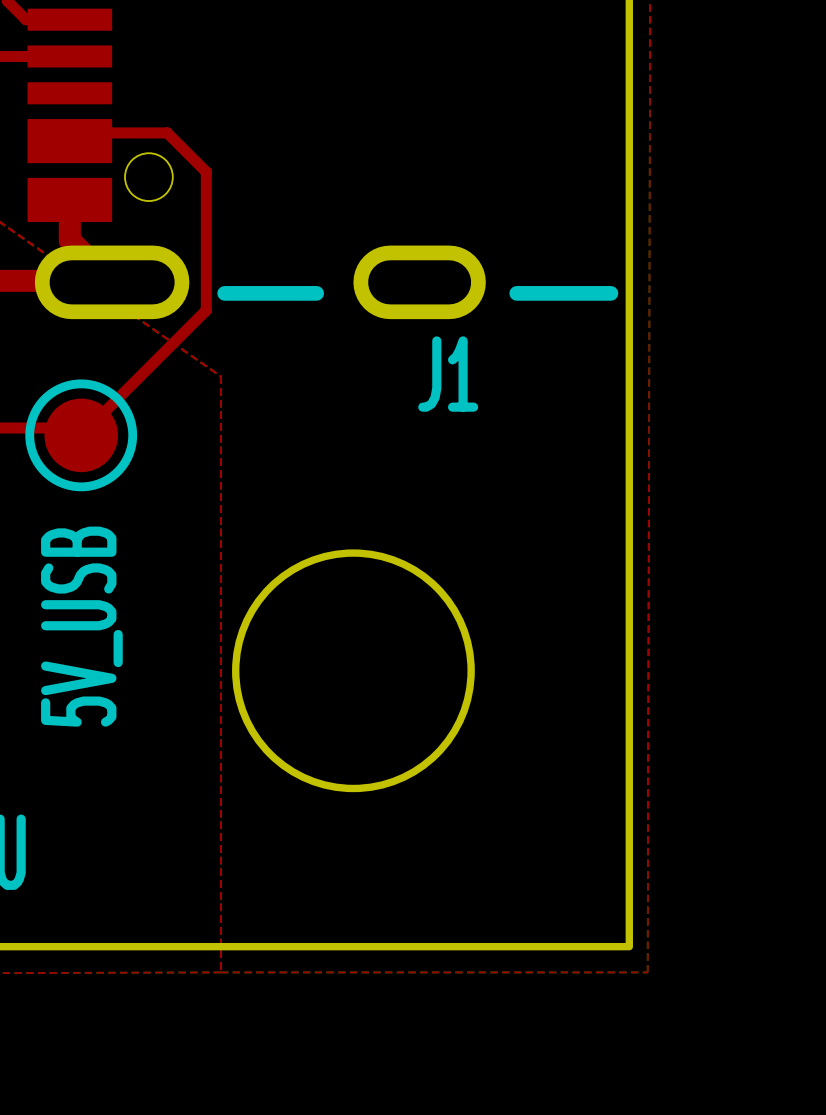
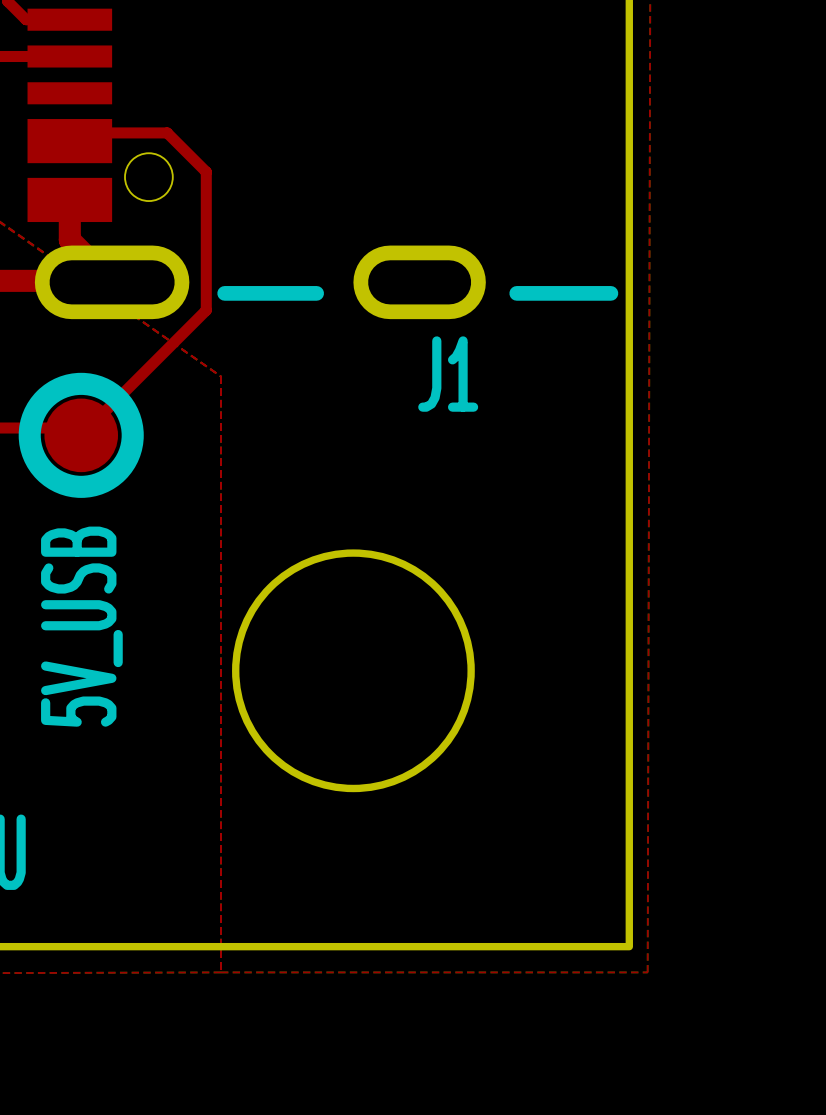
part footprint: [25, 379, 138, 492] -> [18, 372, 144, 498]

